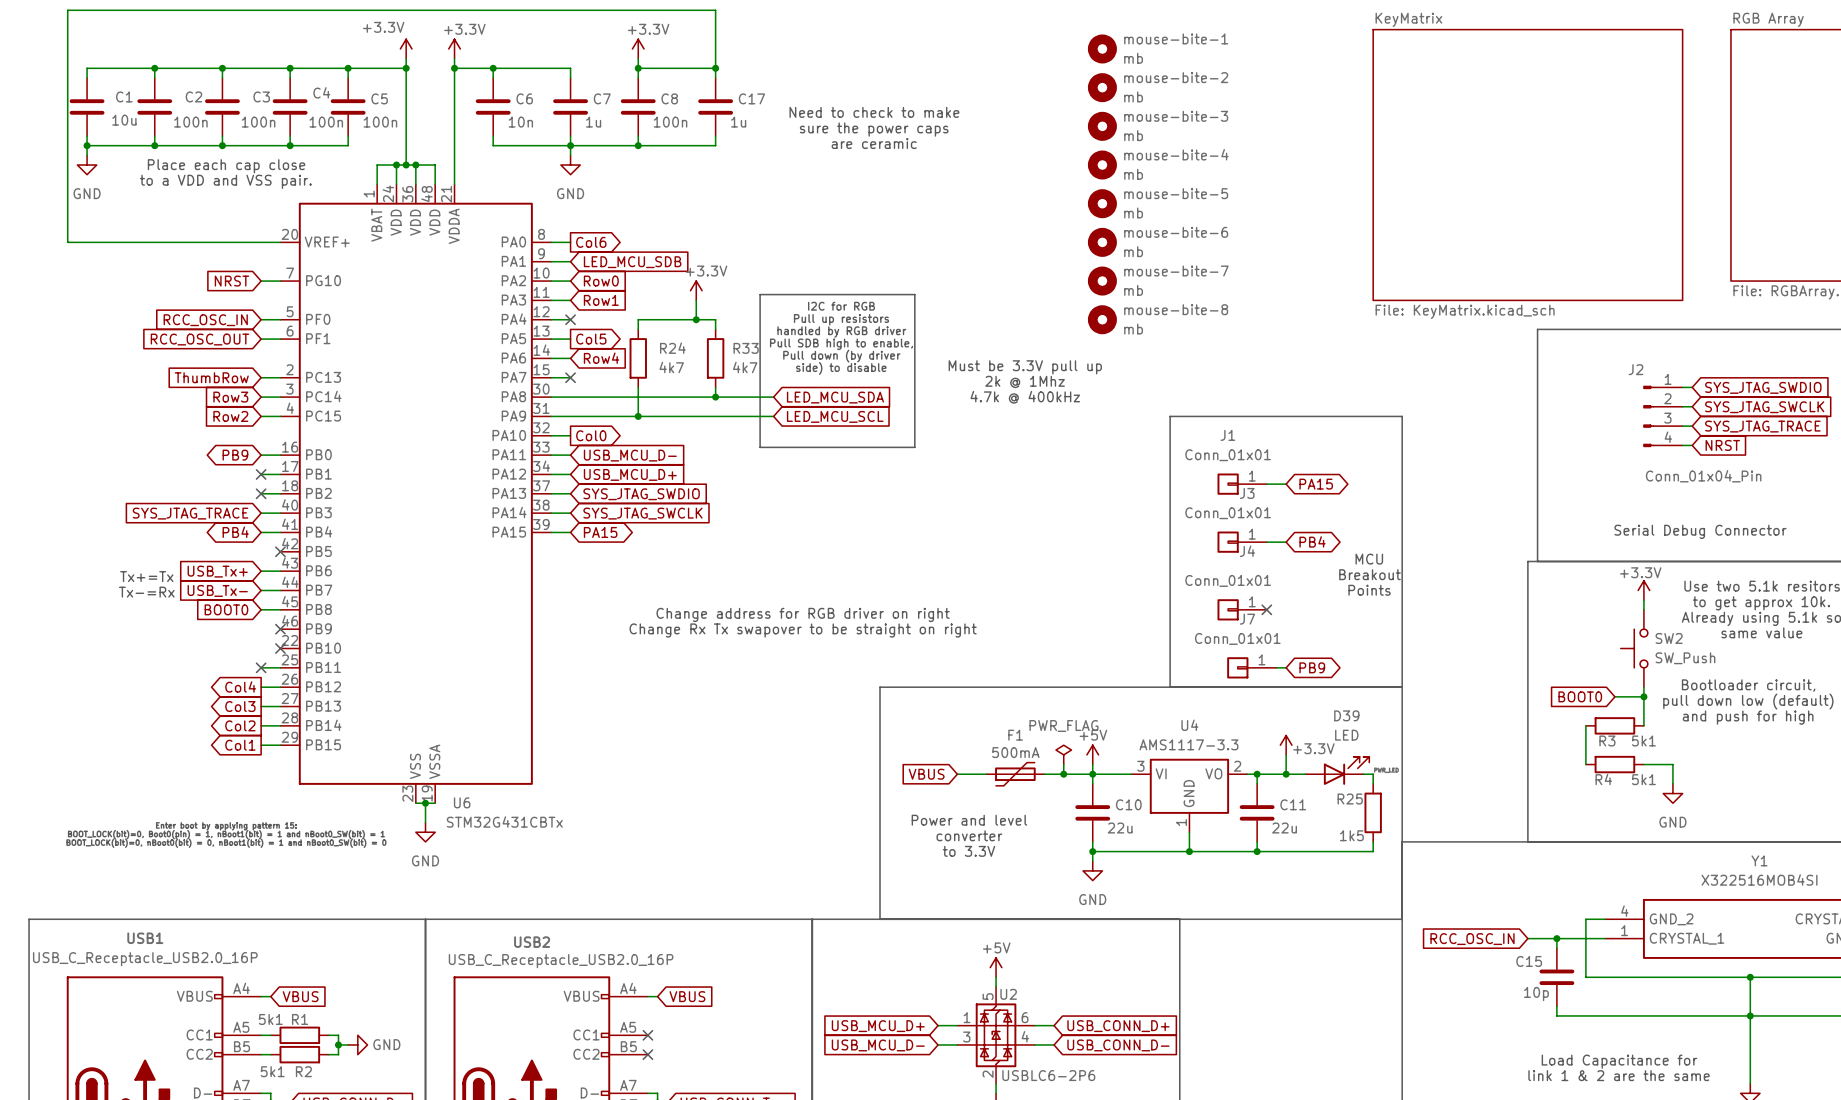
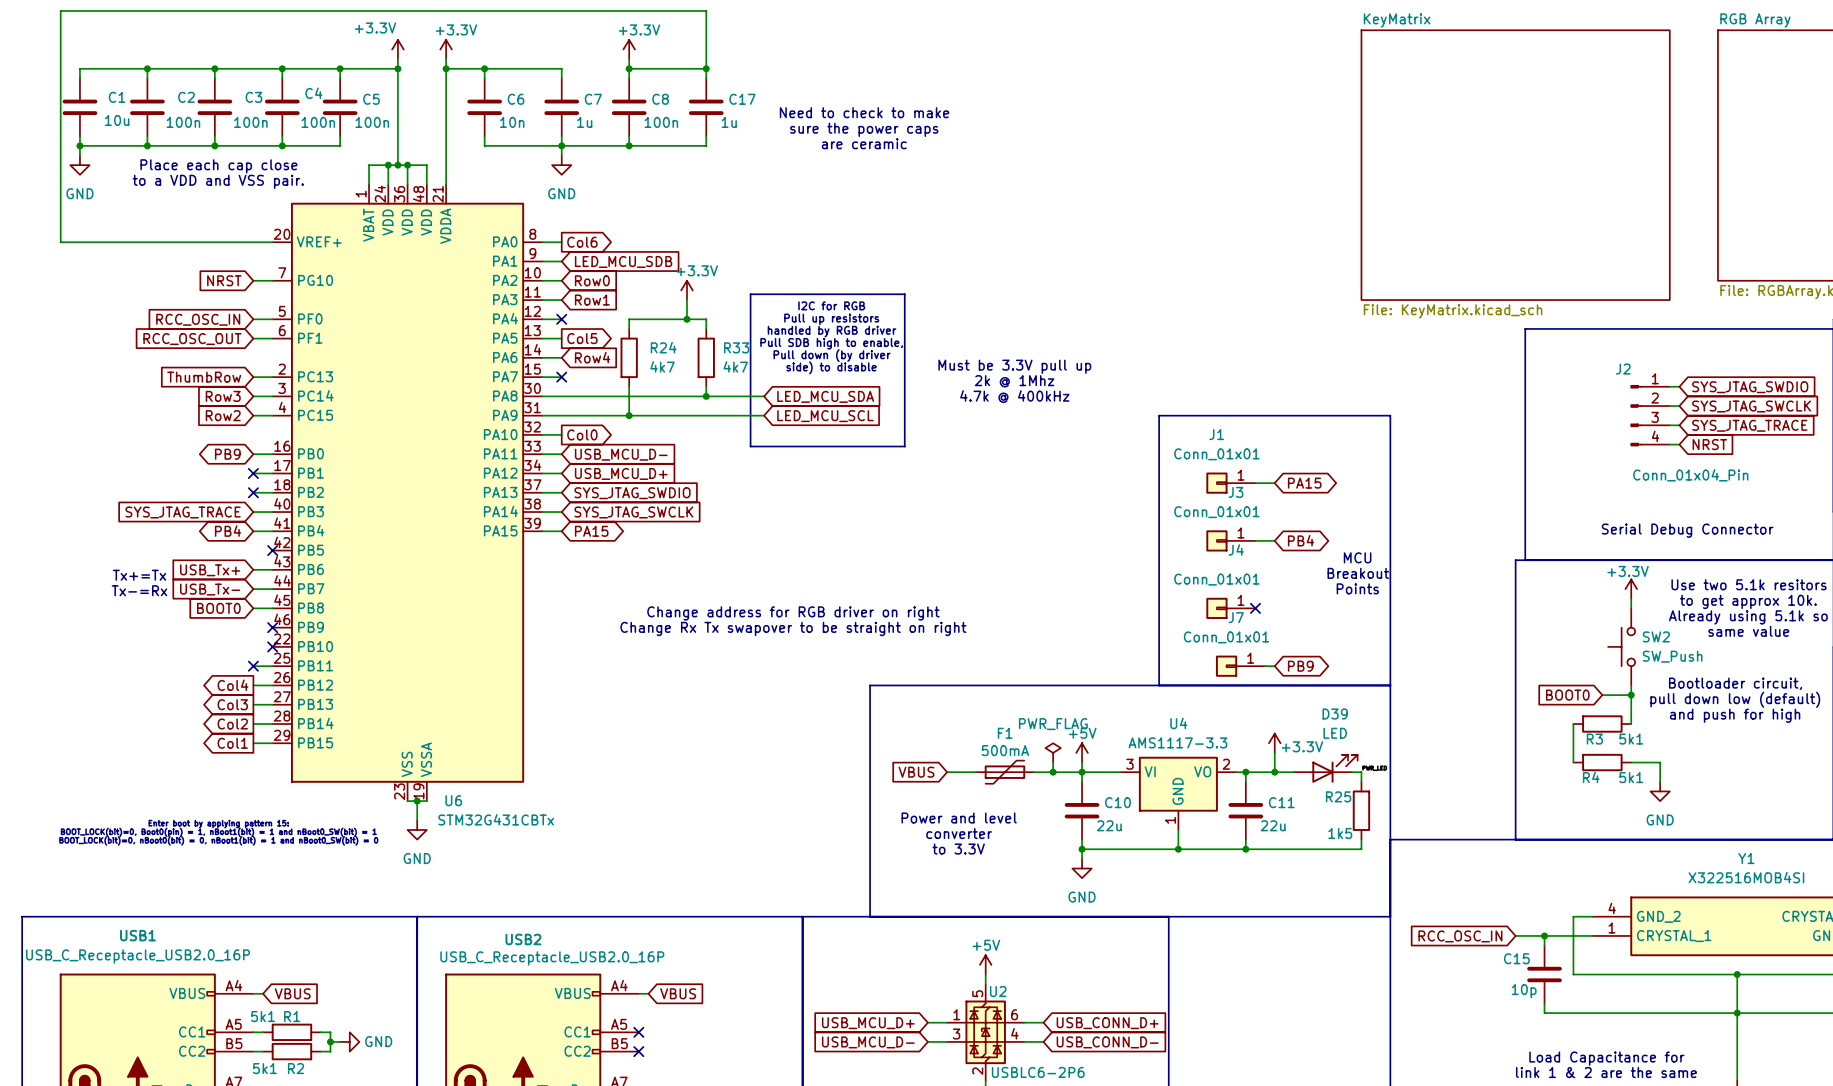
mouse-bite-1: mb (1102, 48) -> none
mouse-bite-2: mb (1102, 87) -> none
mouse-bite-3: mb (1102, 126) -> none
mouse-bite-4: mb (1102, 165) -> none
mouse-bite-5: mb (1102, 203) -> none
mouse-bite-6: mb (1102, 242) -> none
mouse-bite-7: mb (1102, 281) -> none
mouse-bite-8: mb (1102, 319) -> none

